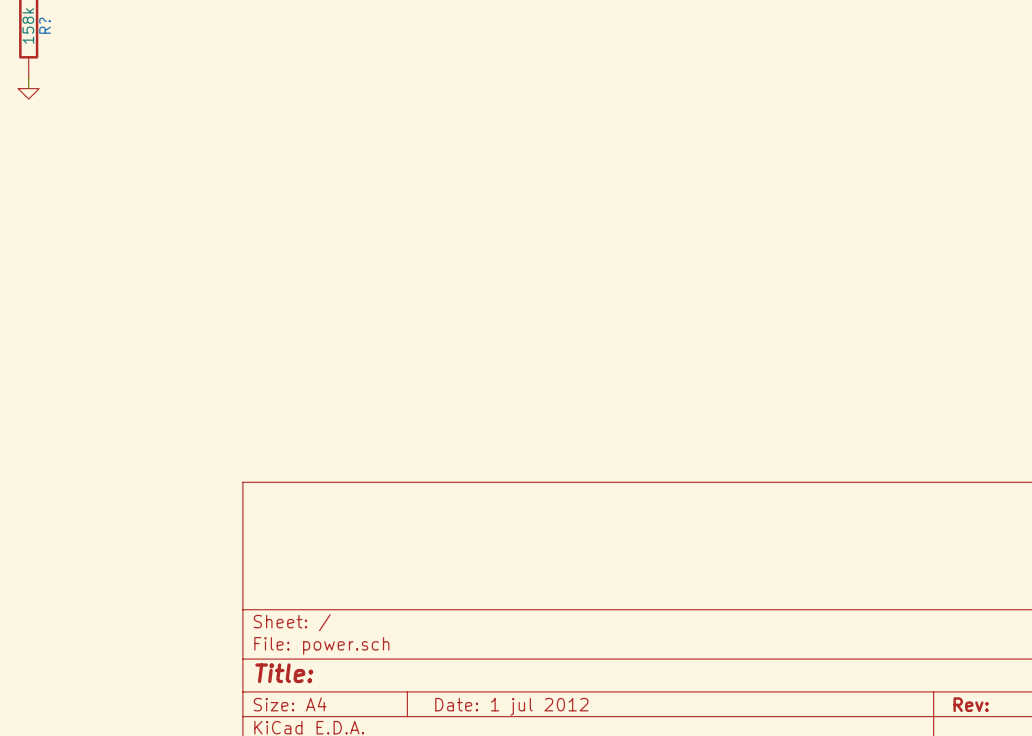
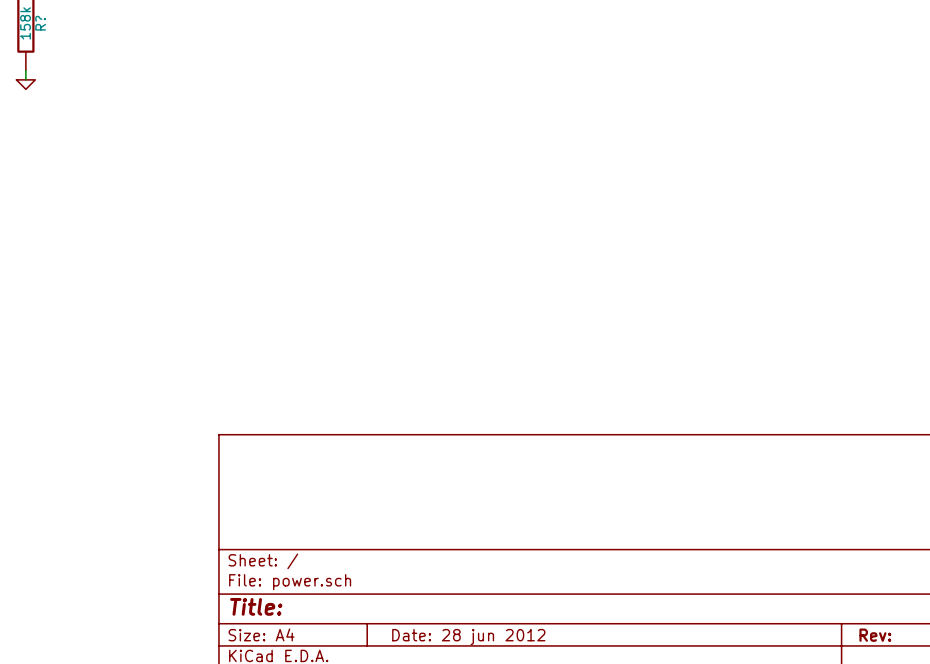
title block: Date: 1 jul 2012 (511, 706) -> Date: 28 jun 2012 (468, 637)

